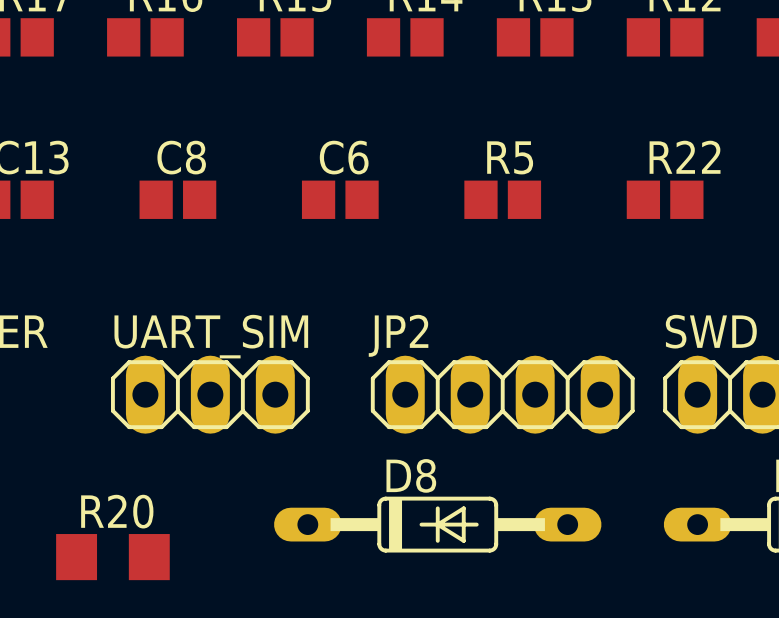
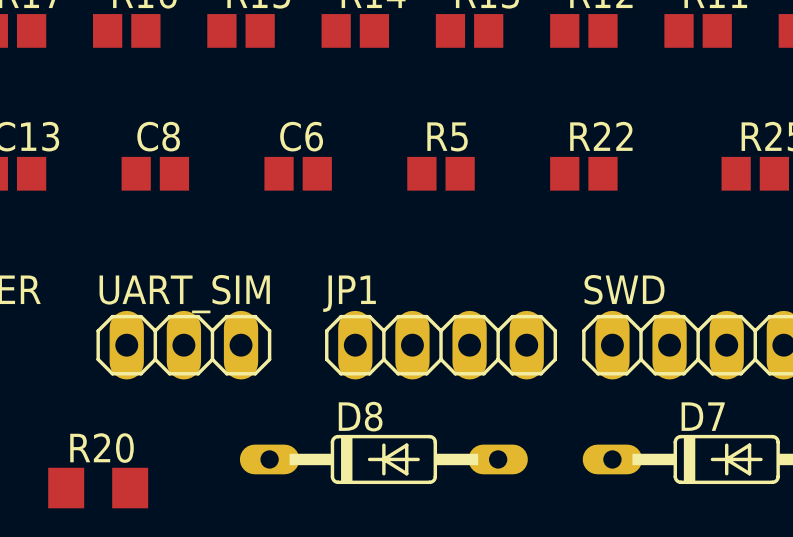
JP2 name: JP2 (398, 335) -> JP1 (349, 293)

